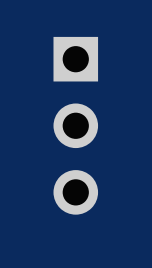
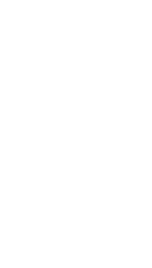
part: (75, 125) -> none

